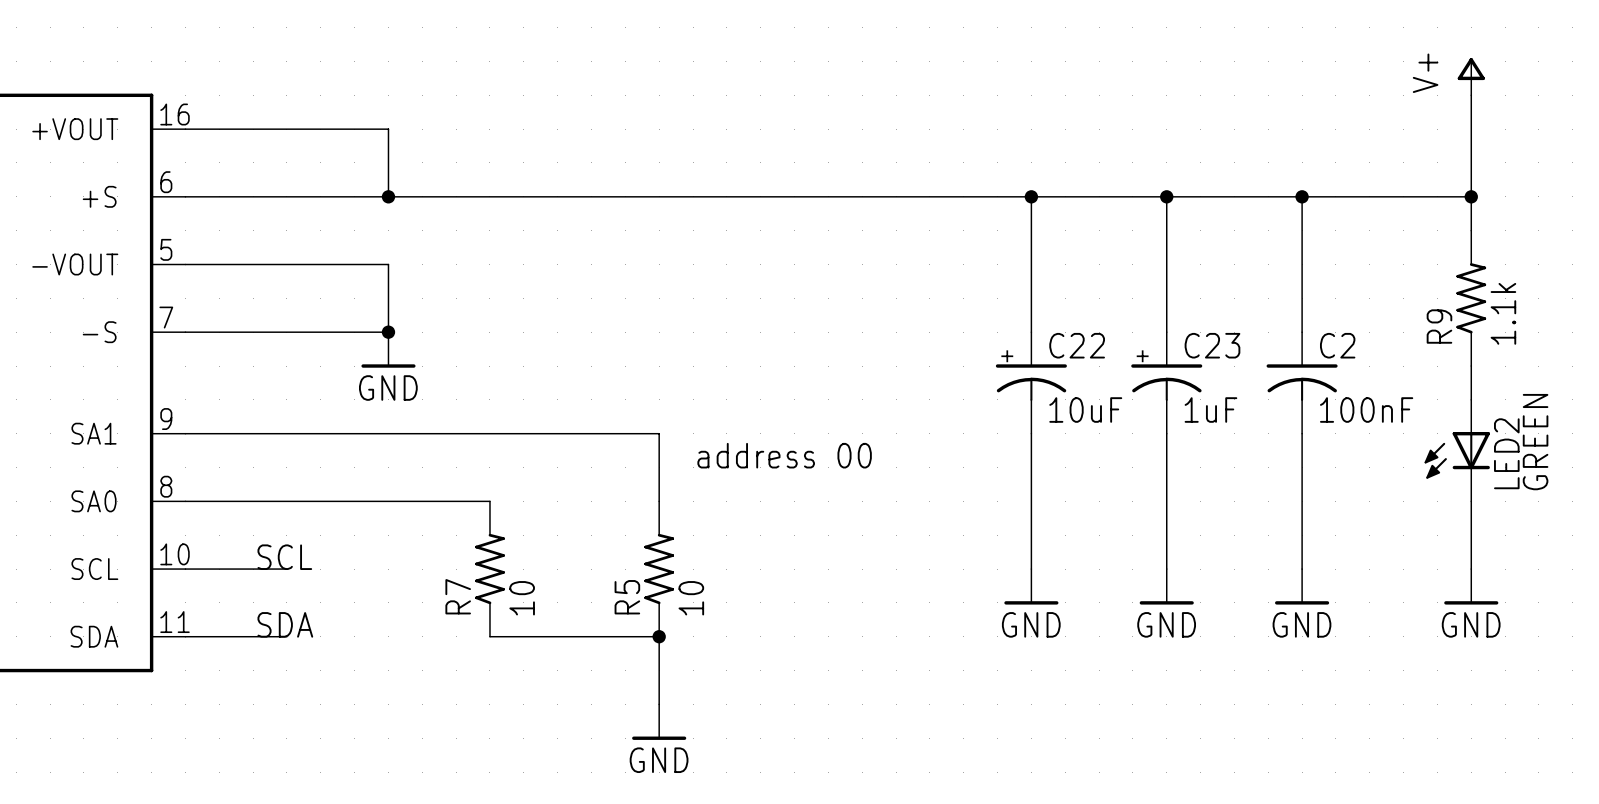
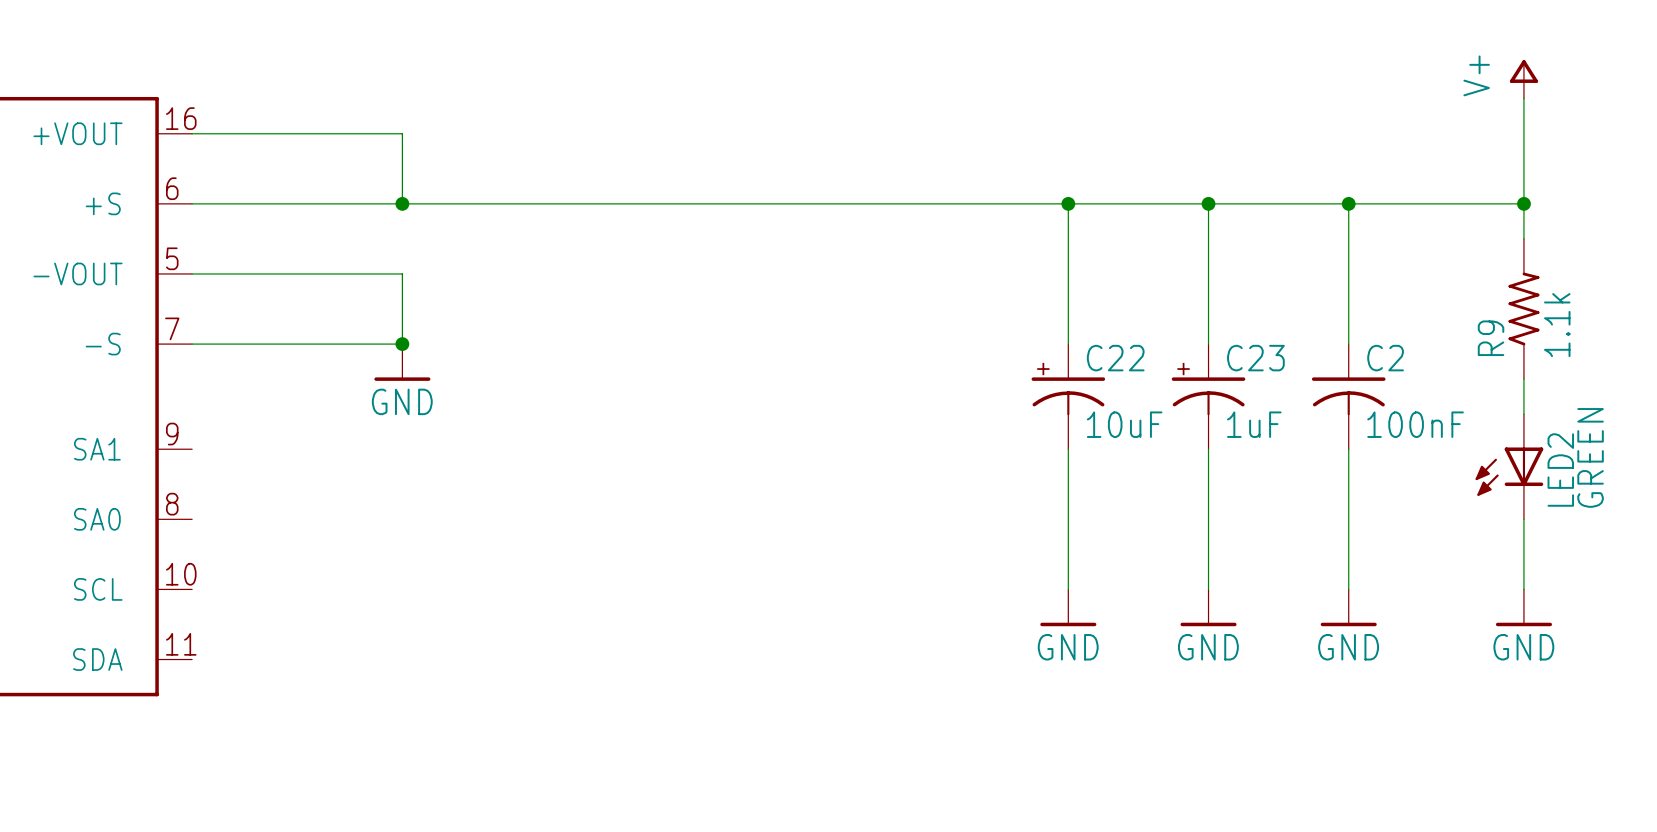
wire: (185, 433) (659, 433) (659, 501) -> none
text: address 00 (784, 455) -> none
wire: (185, 501) (489, 501) -> none
label: SCL (284, 557) -> none
wire: (185, 569) (286, 569) -> none
R7: 10 (489, 569) -> none
R5: 10 (659, 569) -> none
label: SDA (285, 624) -> none
wire: (185, 636) (286, 636) -> none
wire: (489, 636) (659, 636) (659, 704) -> none
junction: (659, 636) -> none
power symbol: GND (659, 722) -> none

